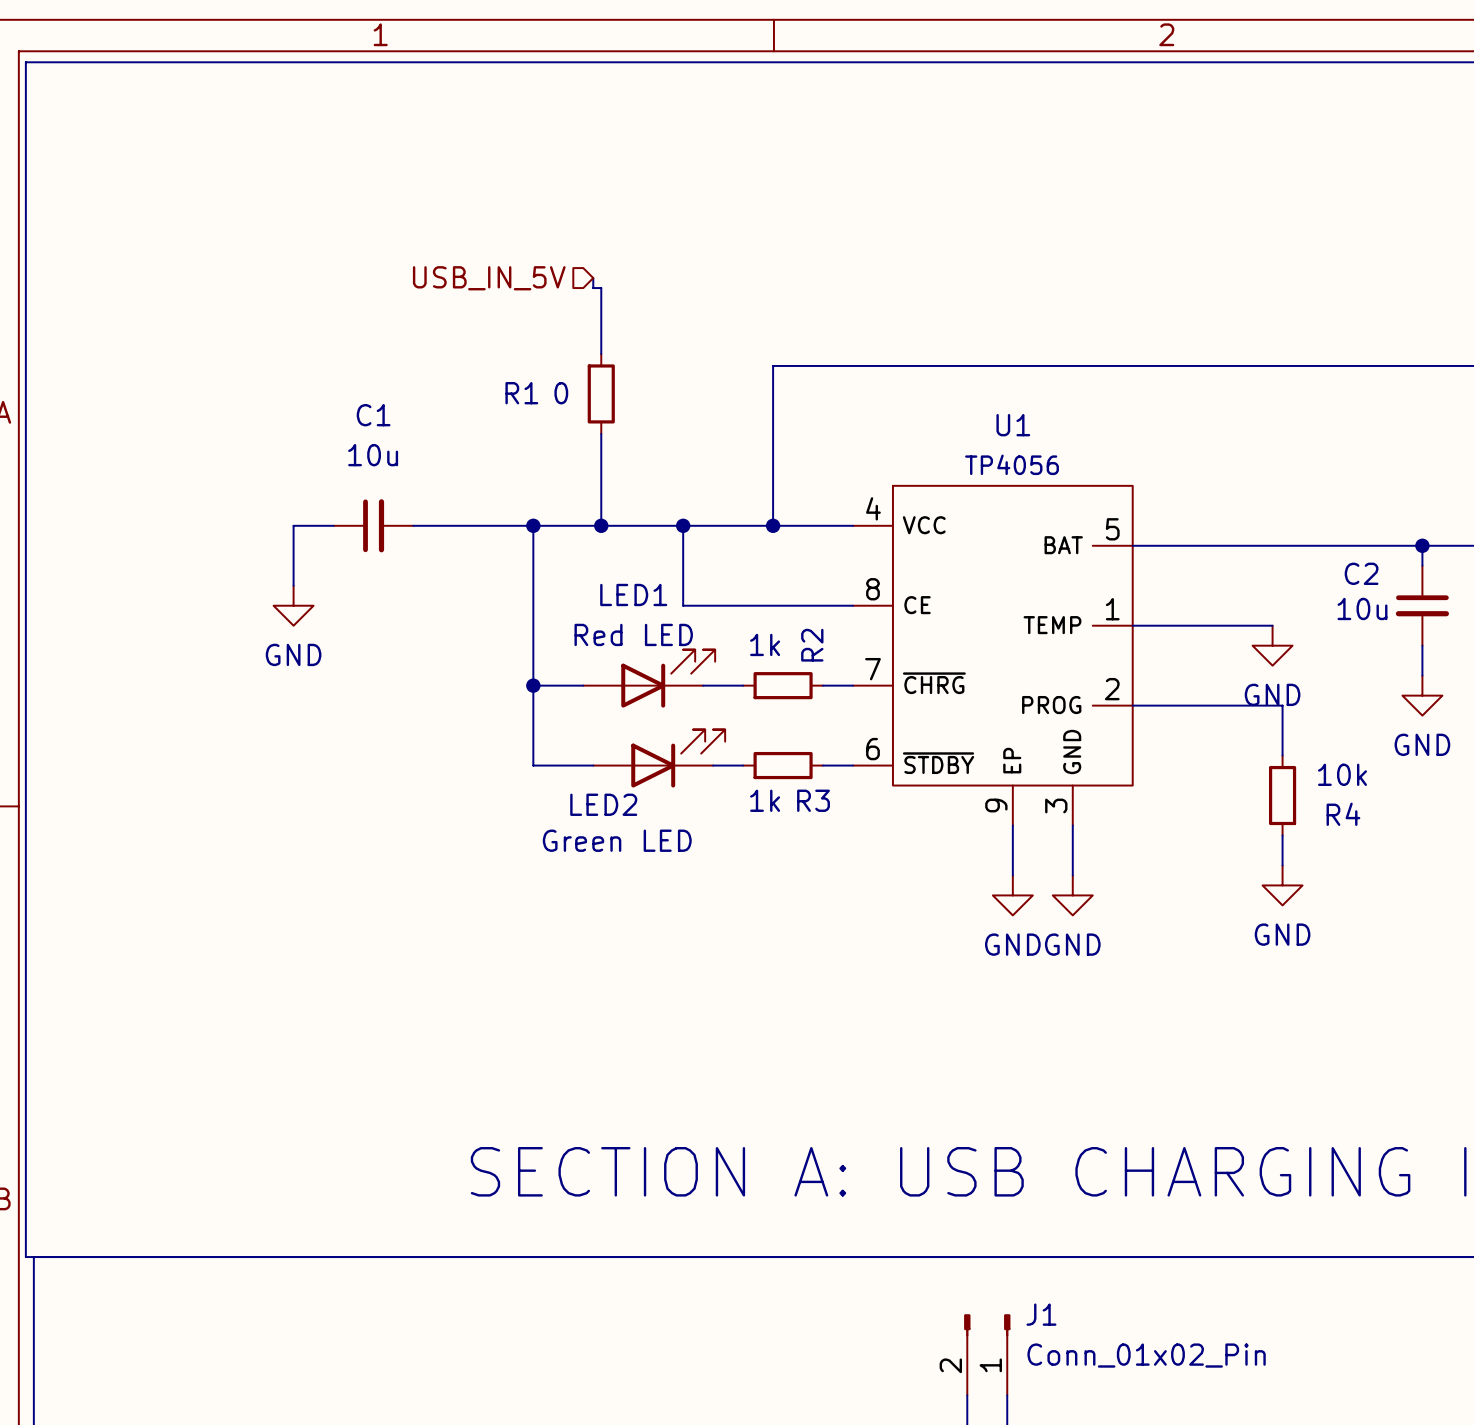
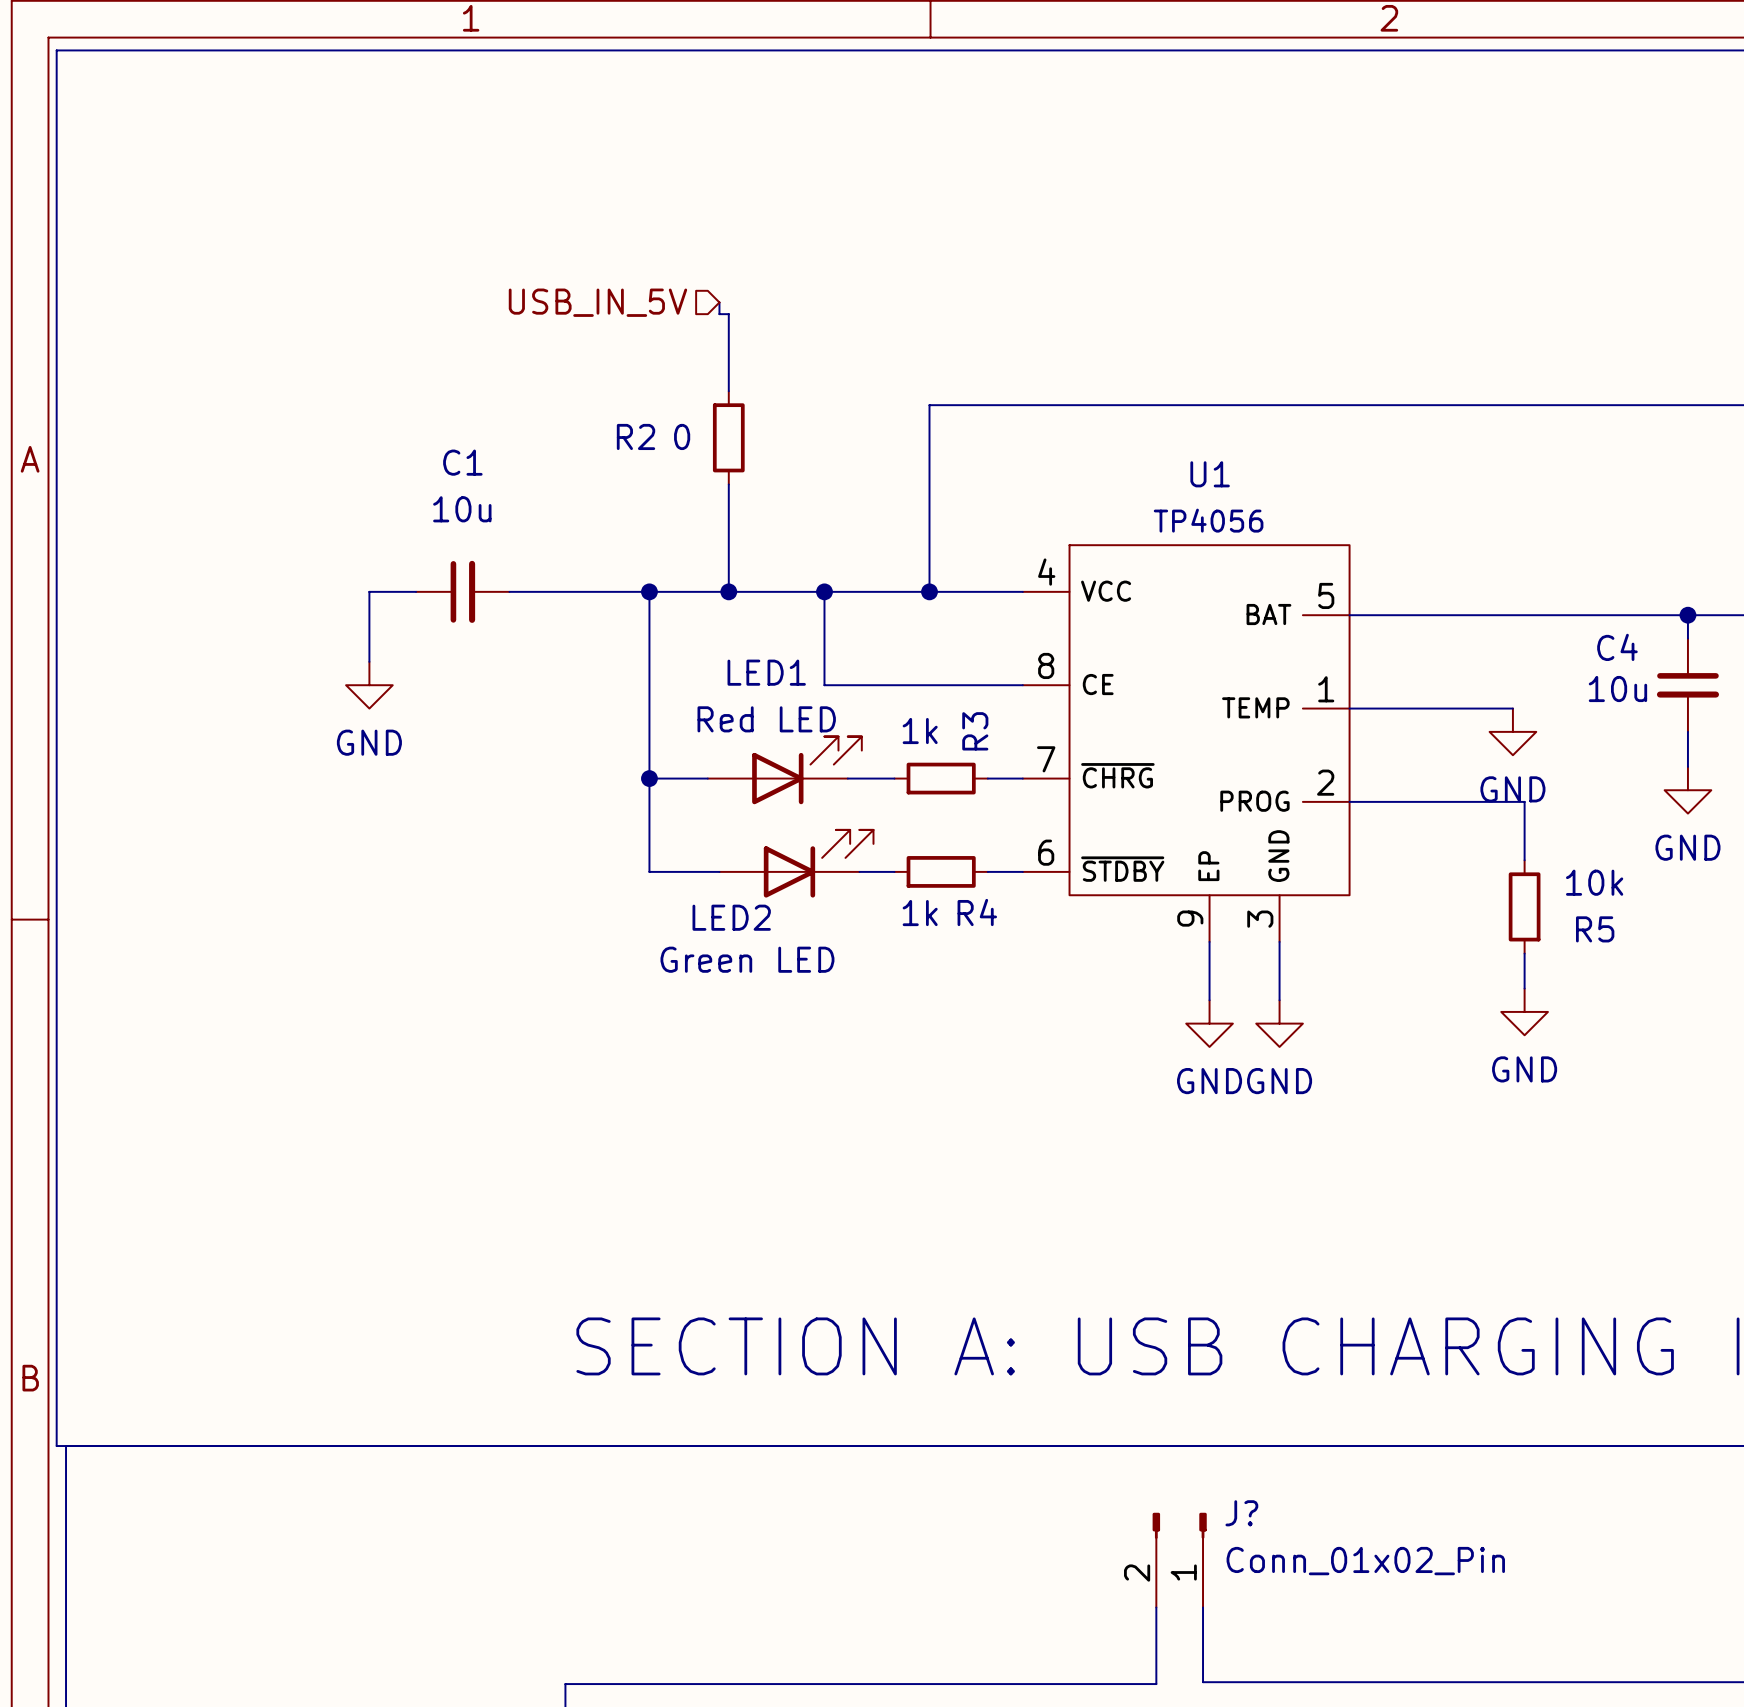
R1 name: R1 (521, 393) -> R2 (636, 436)
C2 name: C2 (1361, 573) -> C4 (1617, 647)
R2 name: R2 (812, 645) -> R3 (975, 731)
R3 name: R3 (813, 800) -> R4 (977, 912)
R4 name: R4 (1343, 814) -> R5 (1595, 929)
J1 name: J1 (1041, 1314) -> J? (1241, 1513)

